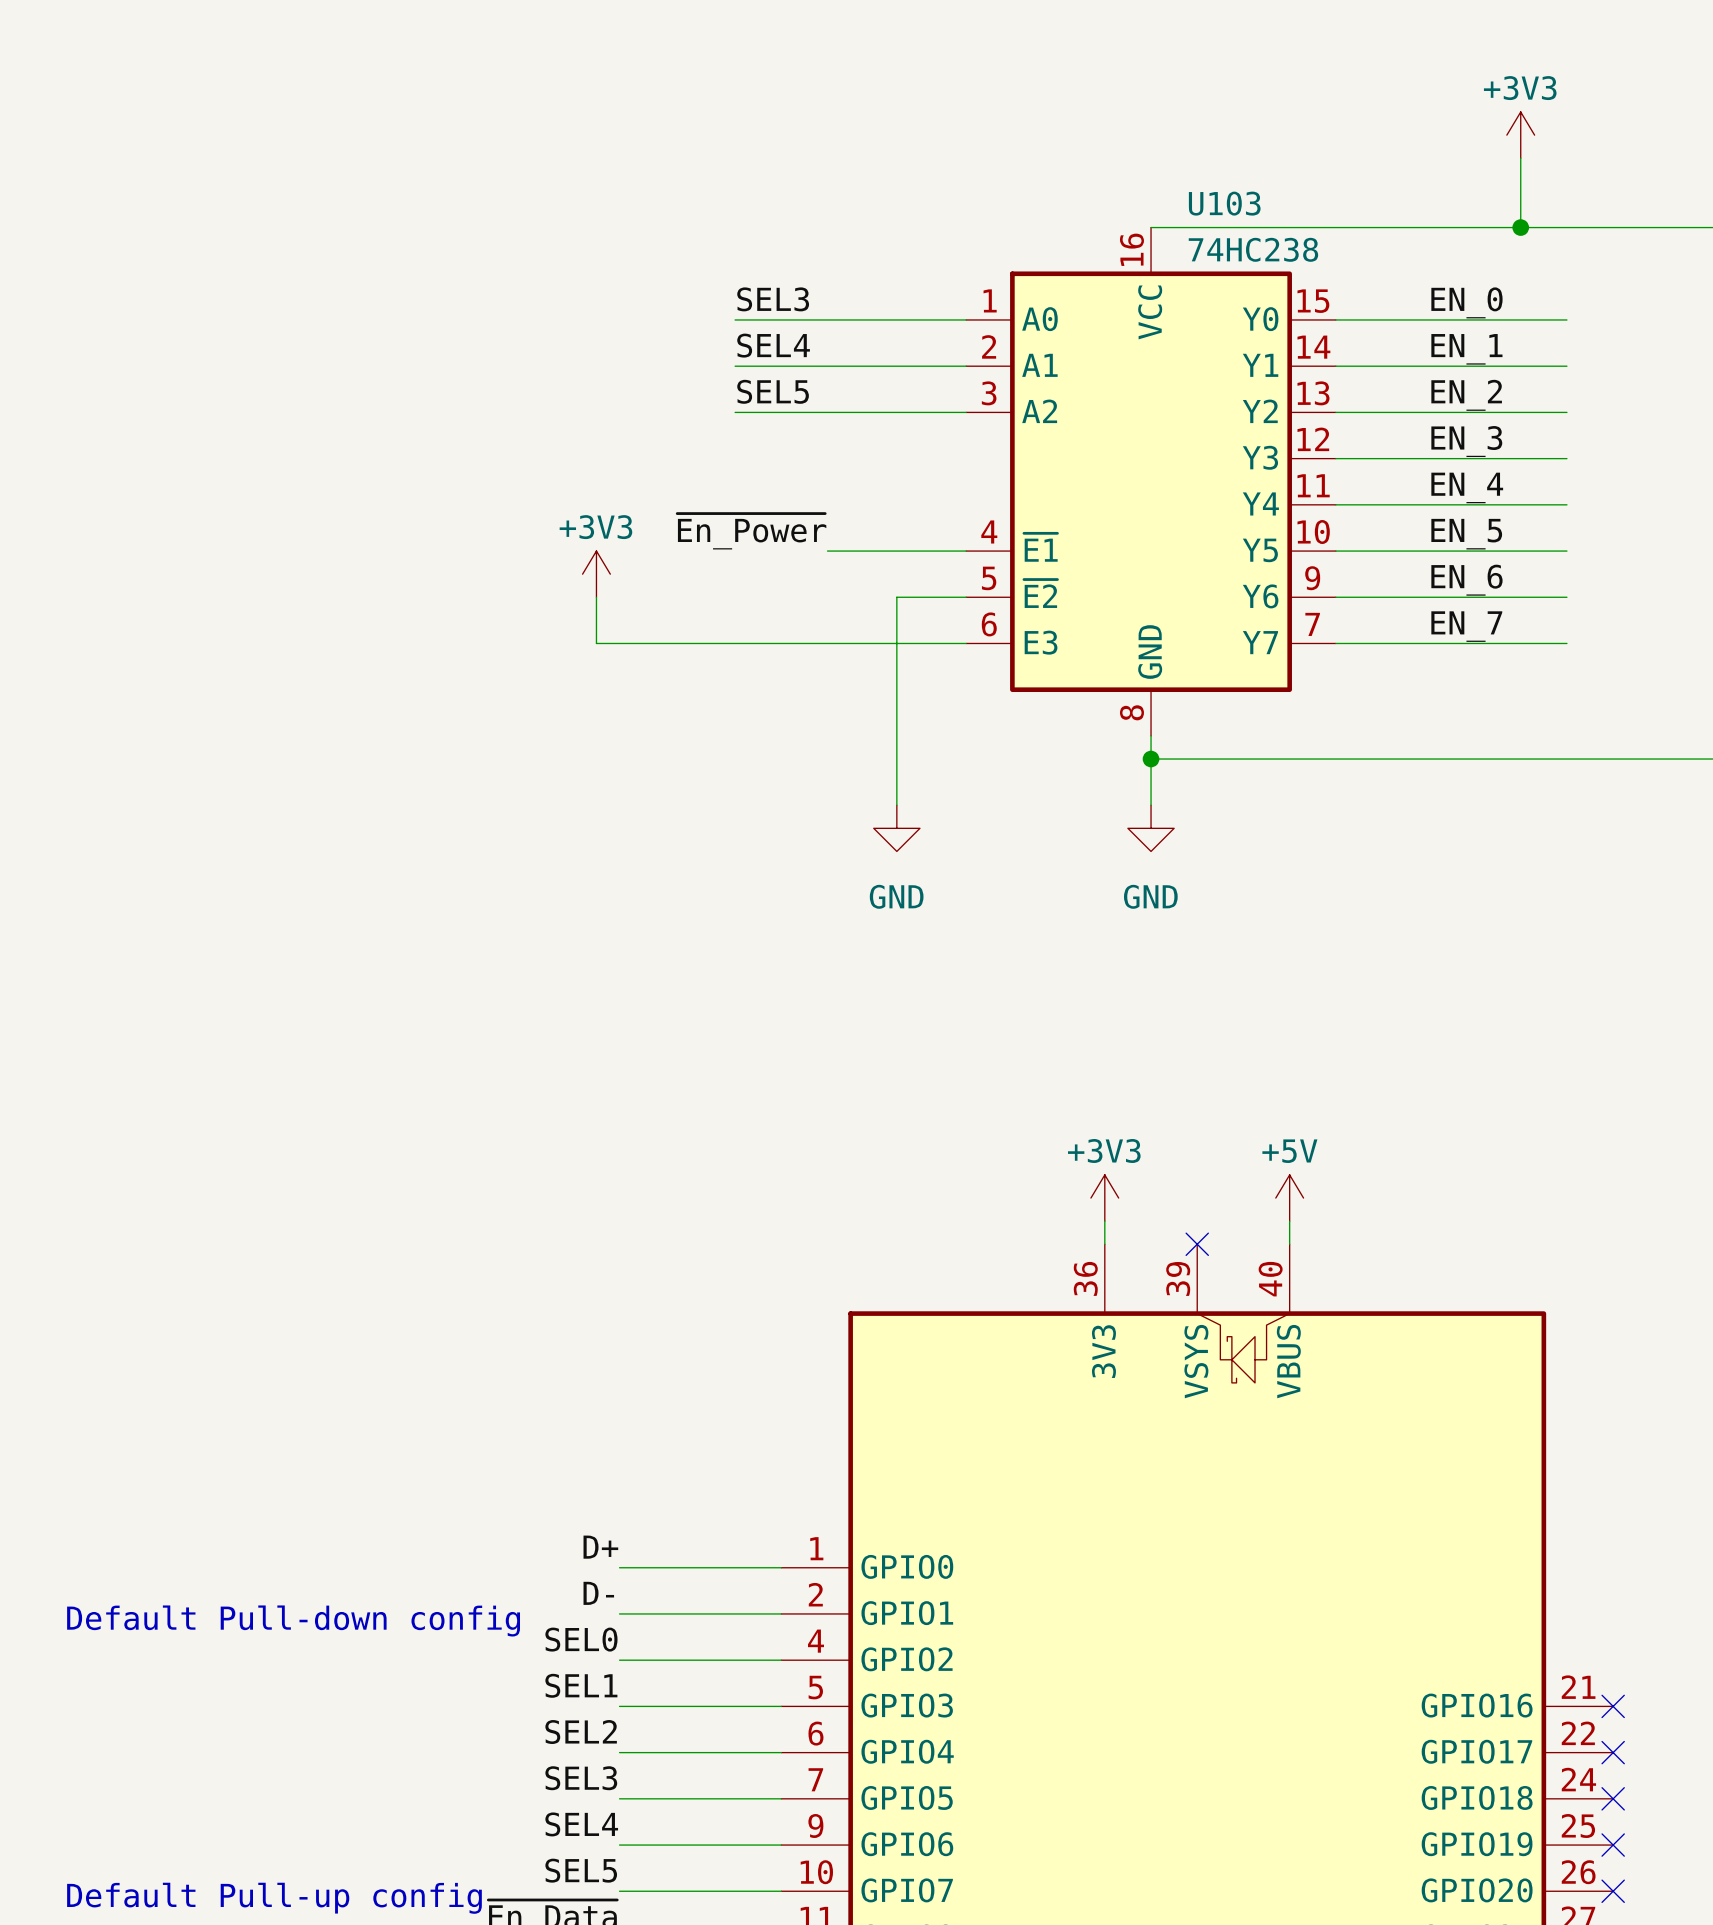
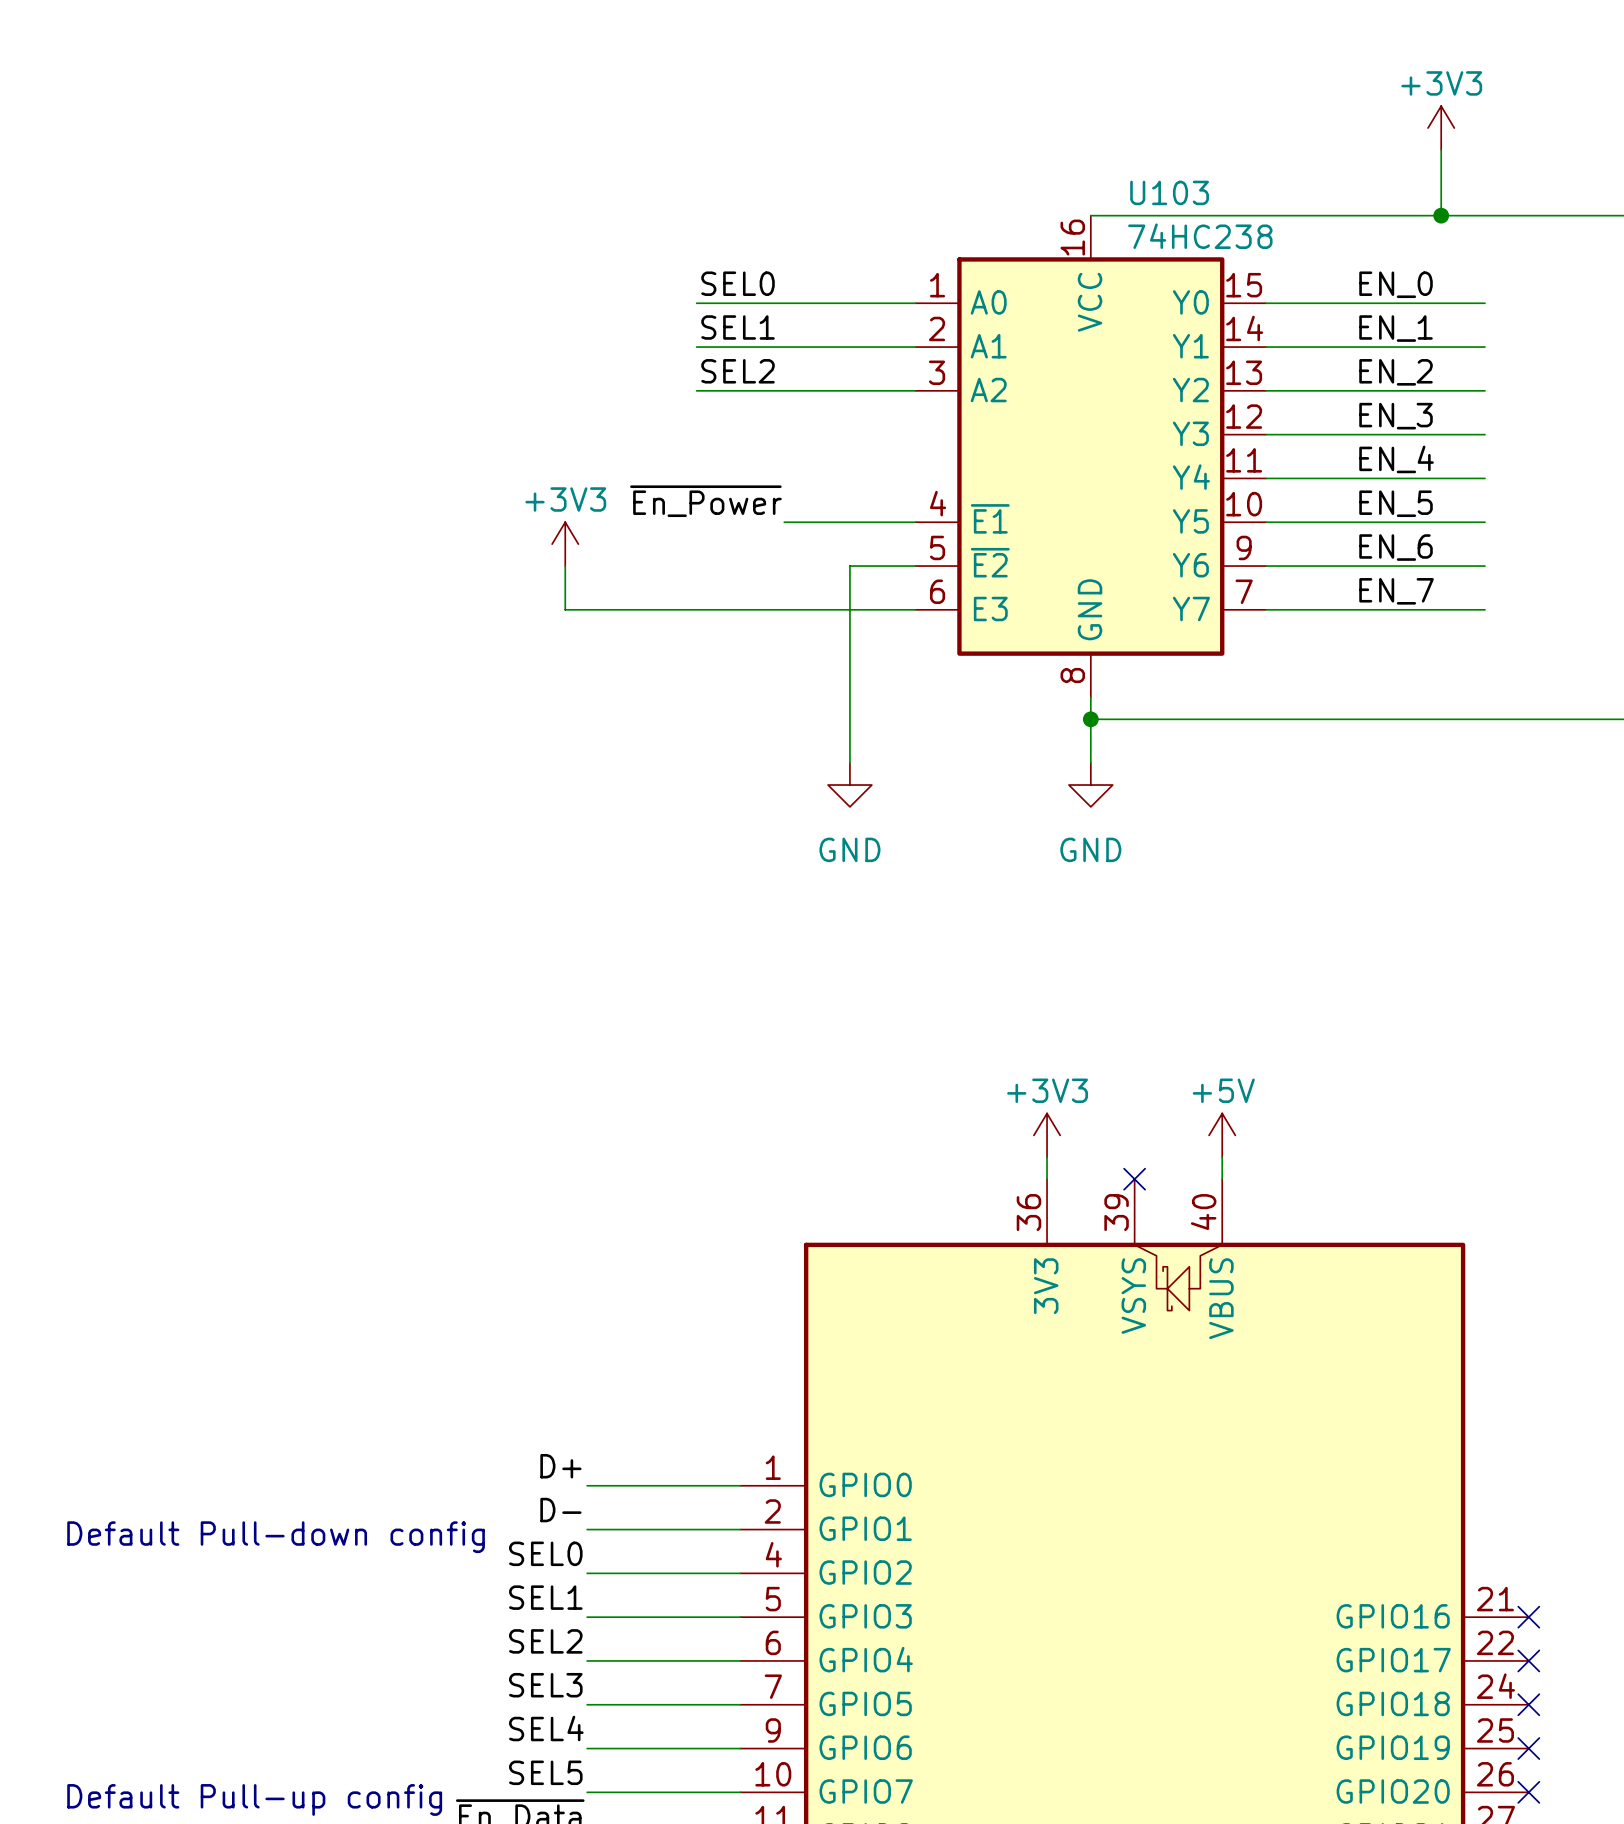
label: SEL3 (773, 299) -> SEL0 (738, 283)
label: SEL4 (773, 345) -> SEL1 (738, 327)
label: SEL5 (773, 391) -> SEL2 (738, 371)

